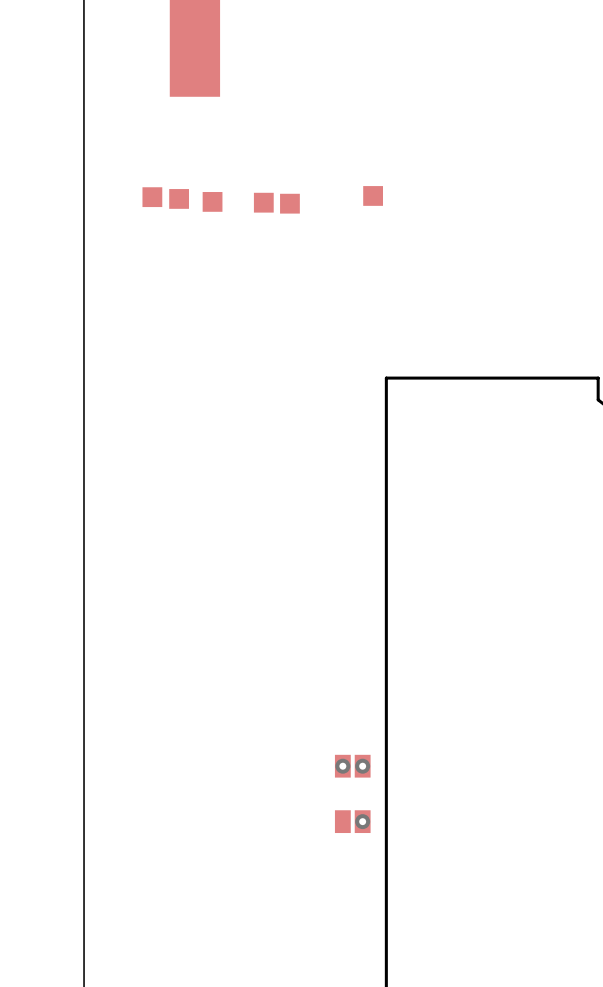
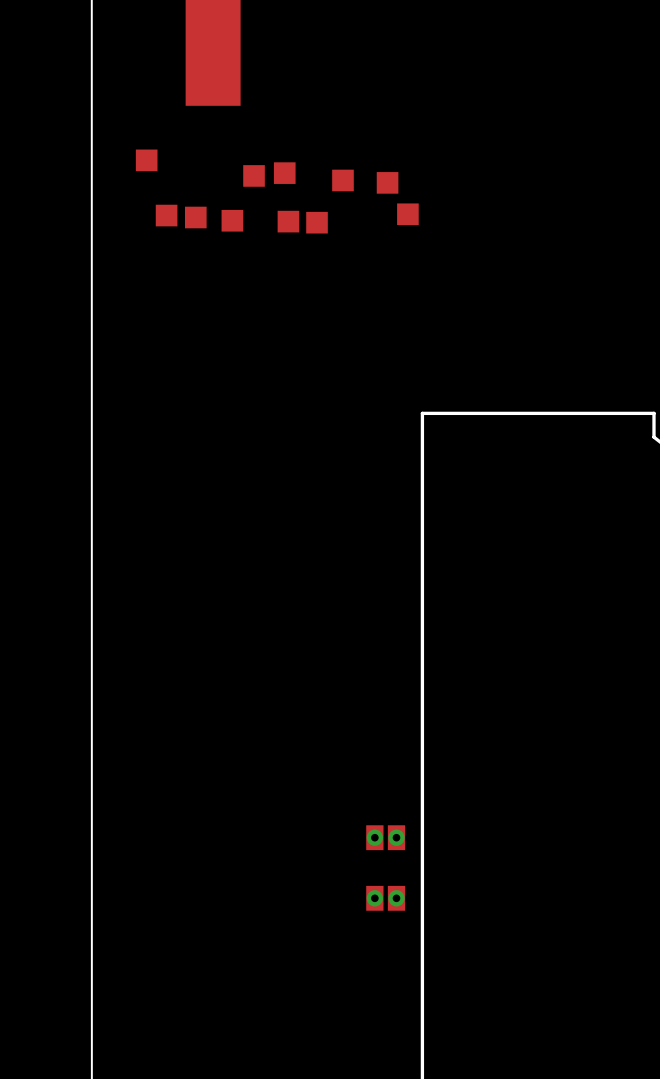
part: none -> (146, 160)
part: none -> (284, 173)
part: none -> (254, 175)
part: none -> (342, 180)
part: none -> (387, 182)
via: none -> (374, 898)

